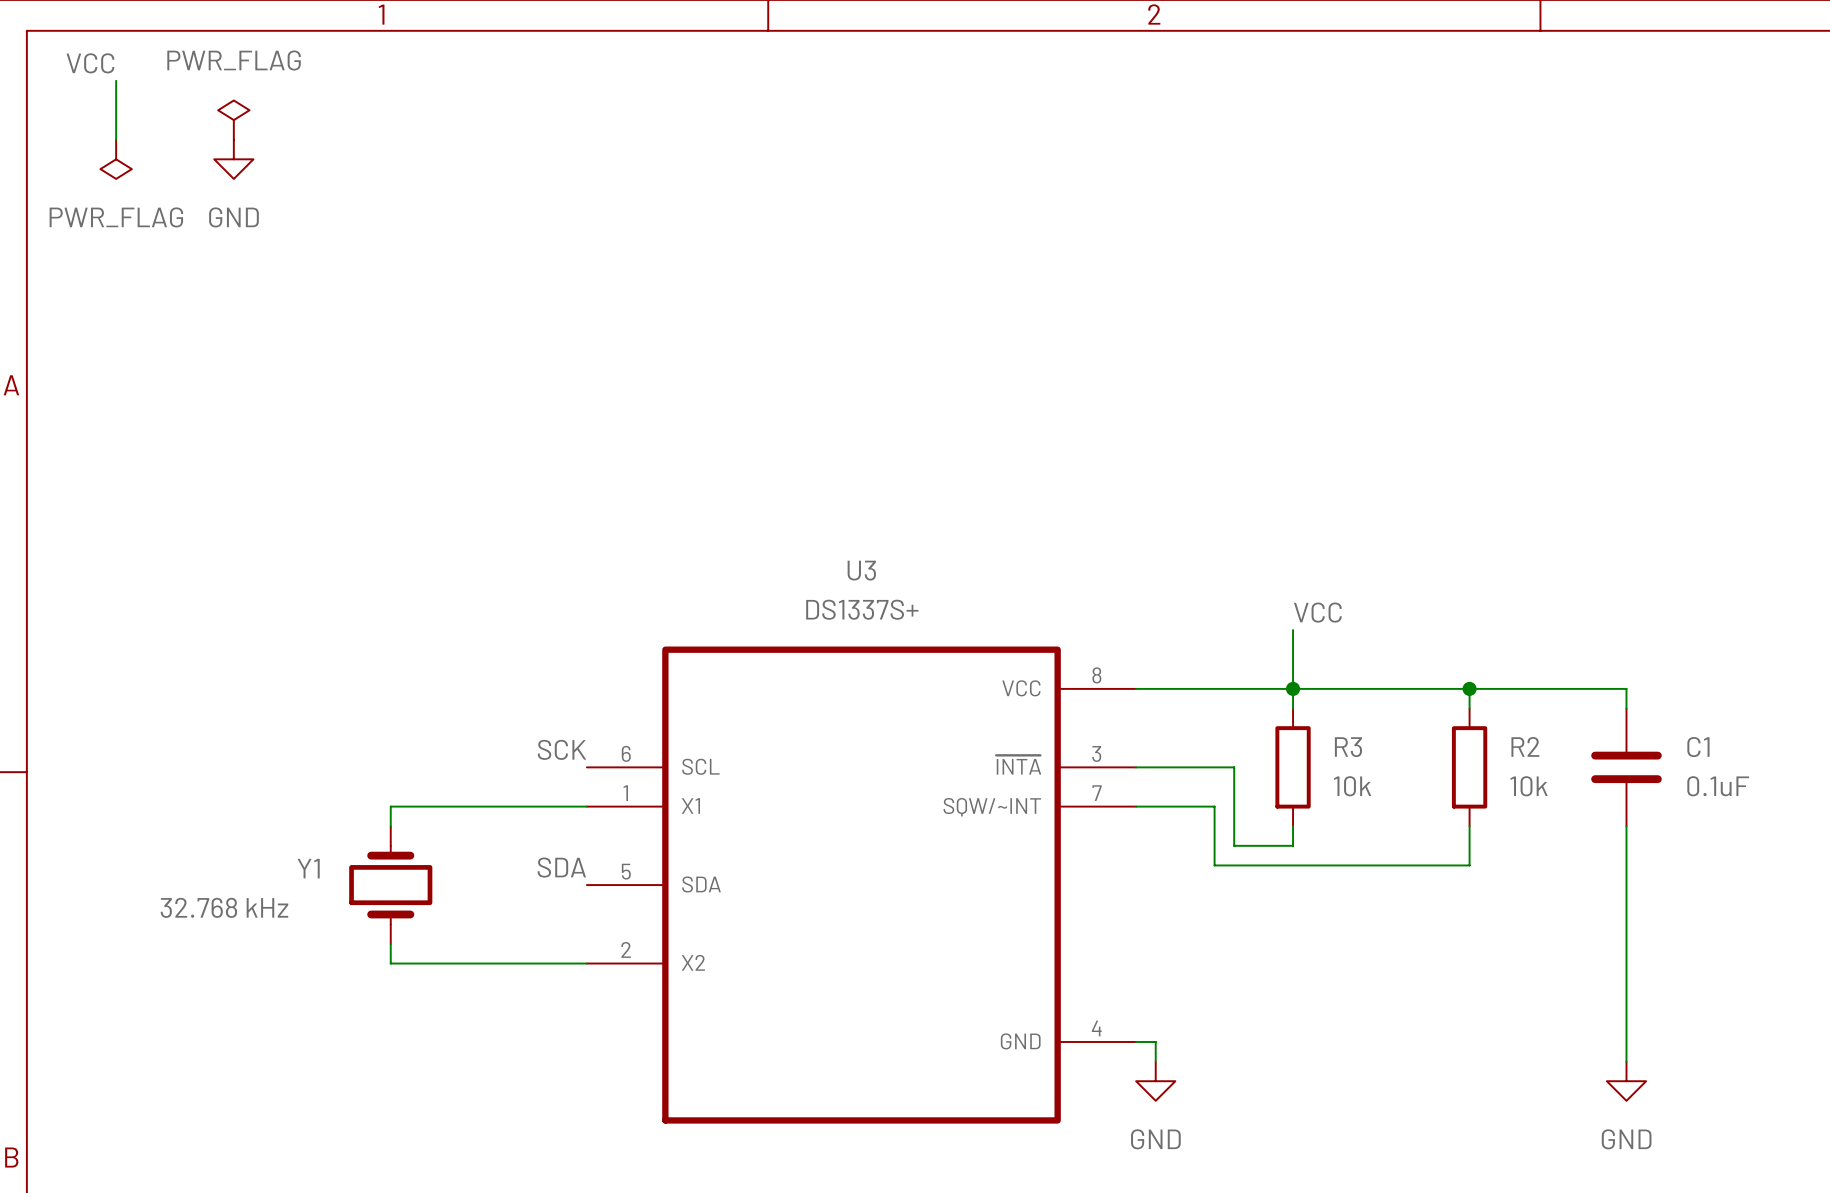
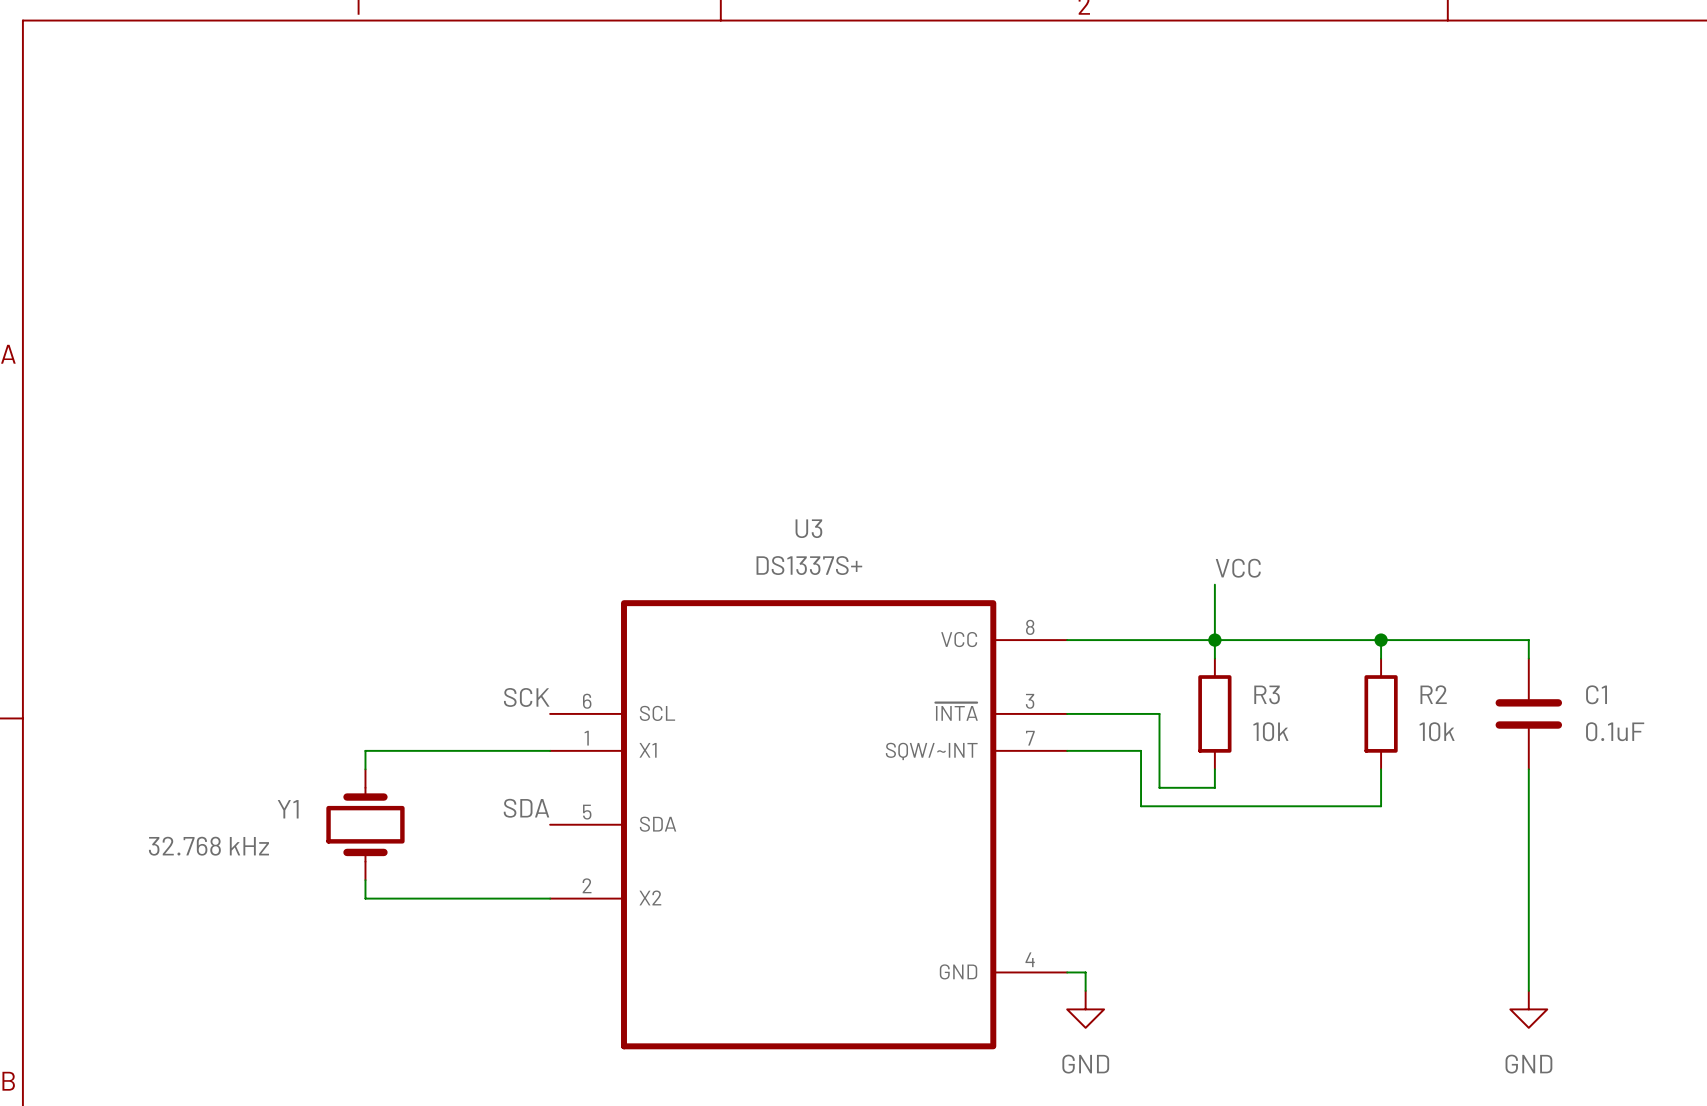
label: VCC (90, 63) -> none
wire: (116, 80) (116, 139) -> none
power symbol: PWR_FLAG (233, 120) -> none
power symbol: PWR_FLAG (116, 159) -> none
power symbol: GND (233, 159) -> none

